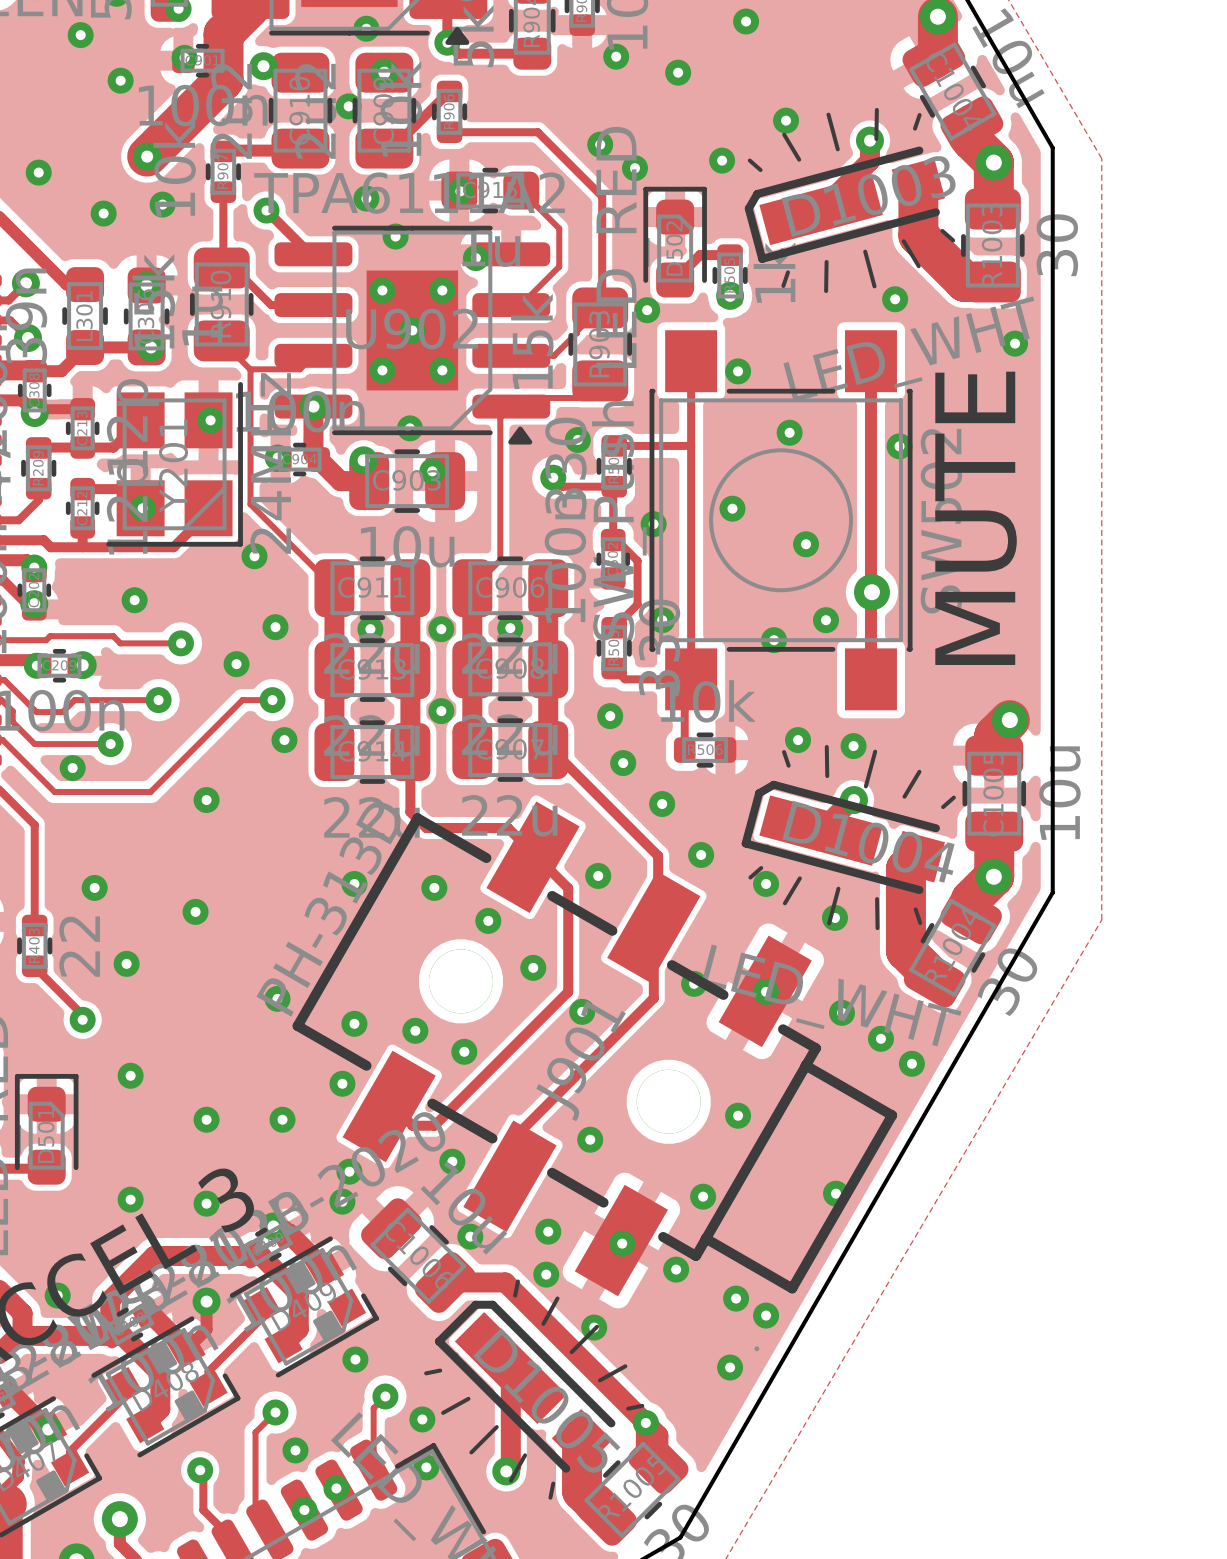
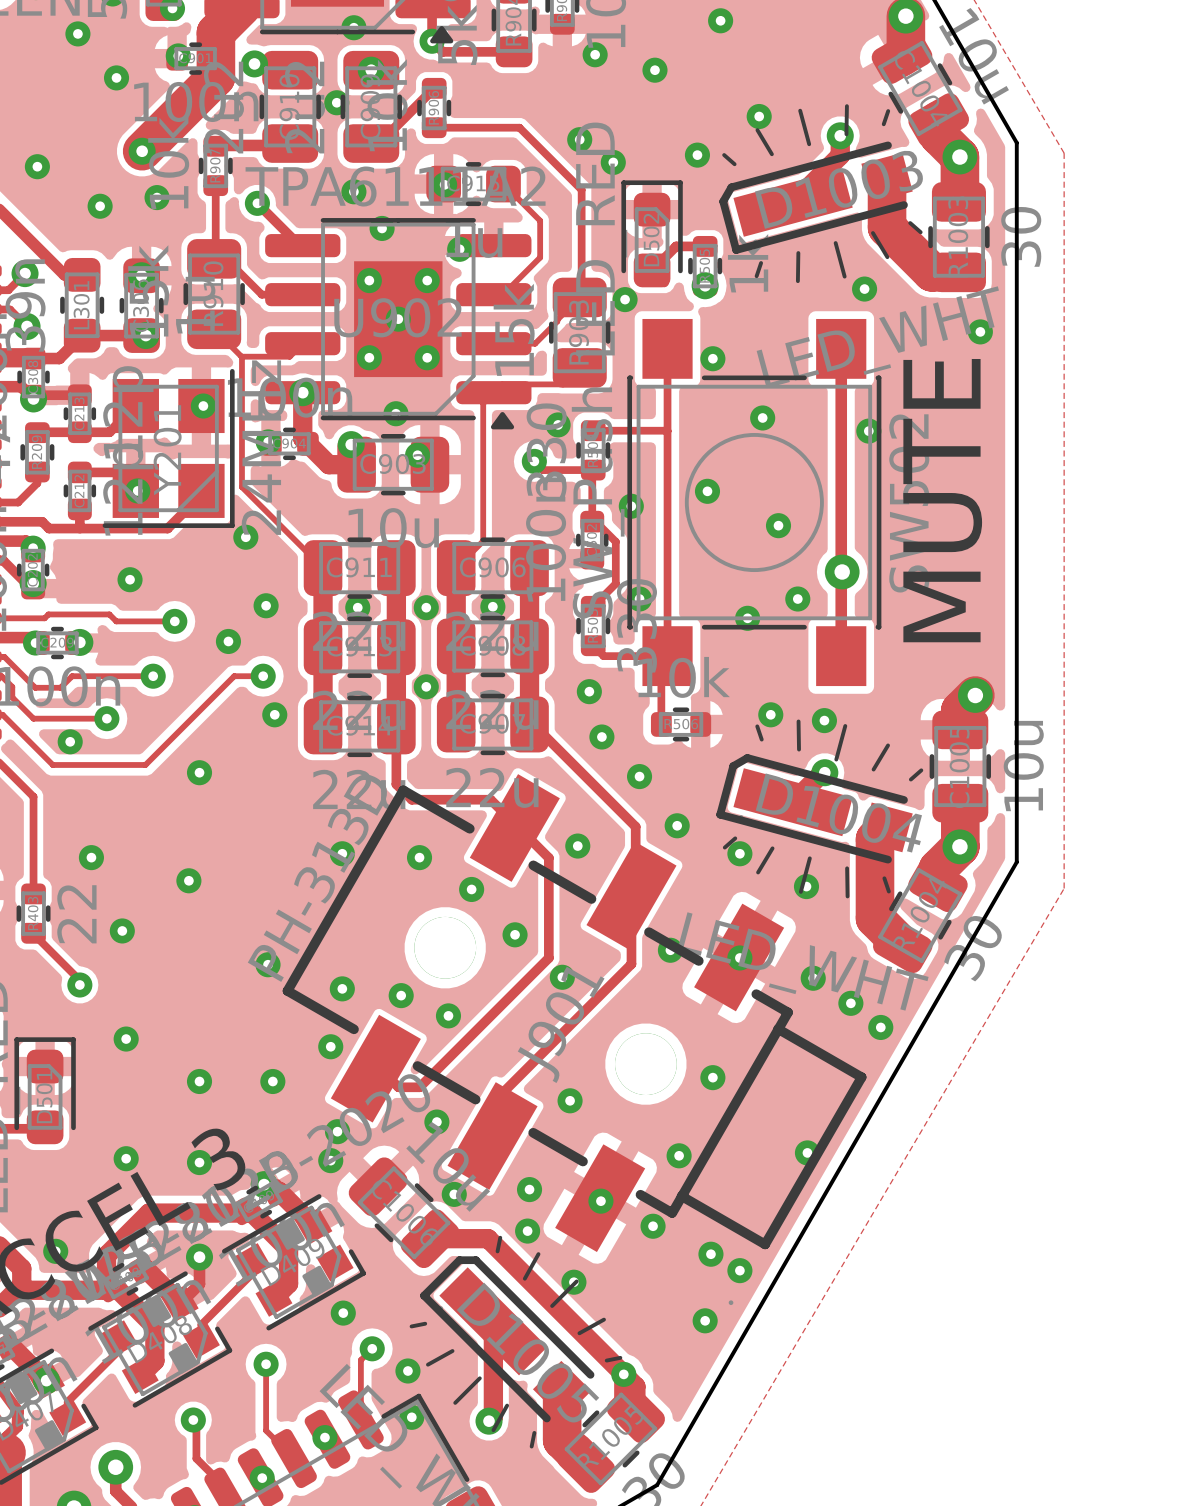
track: (275, 1412) (255, 1432) (255, 1515) (269, 1530) -> (266, 1364) (266, 1430) (294, 1458)
via: (295, 1450) -> none
via position: (304, 1510) -> (262, 1478)

